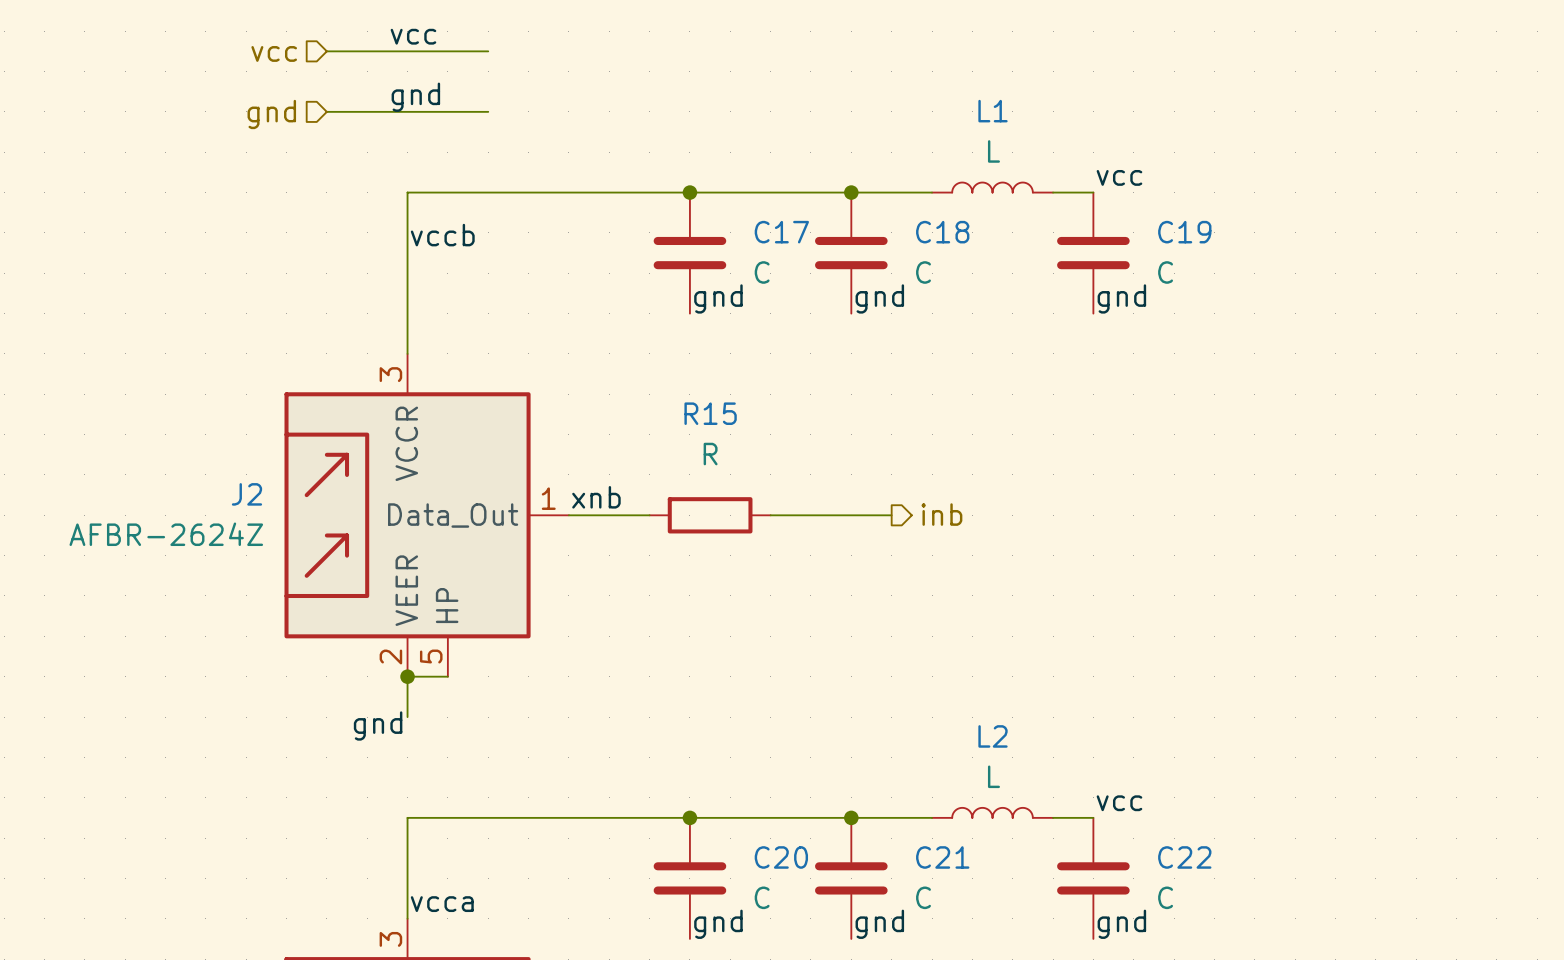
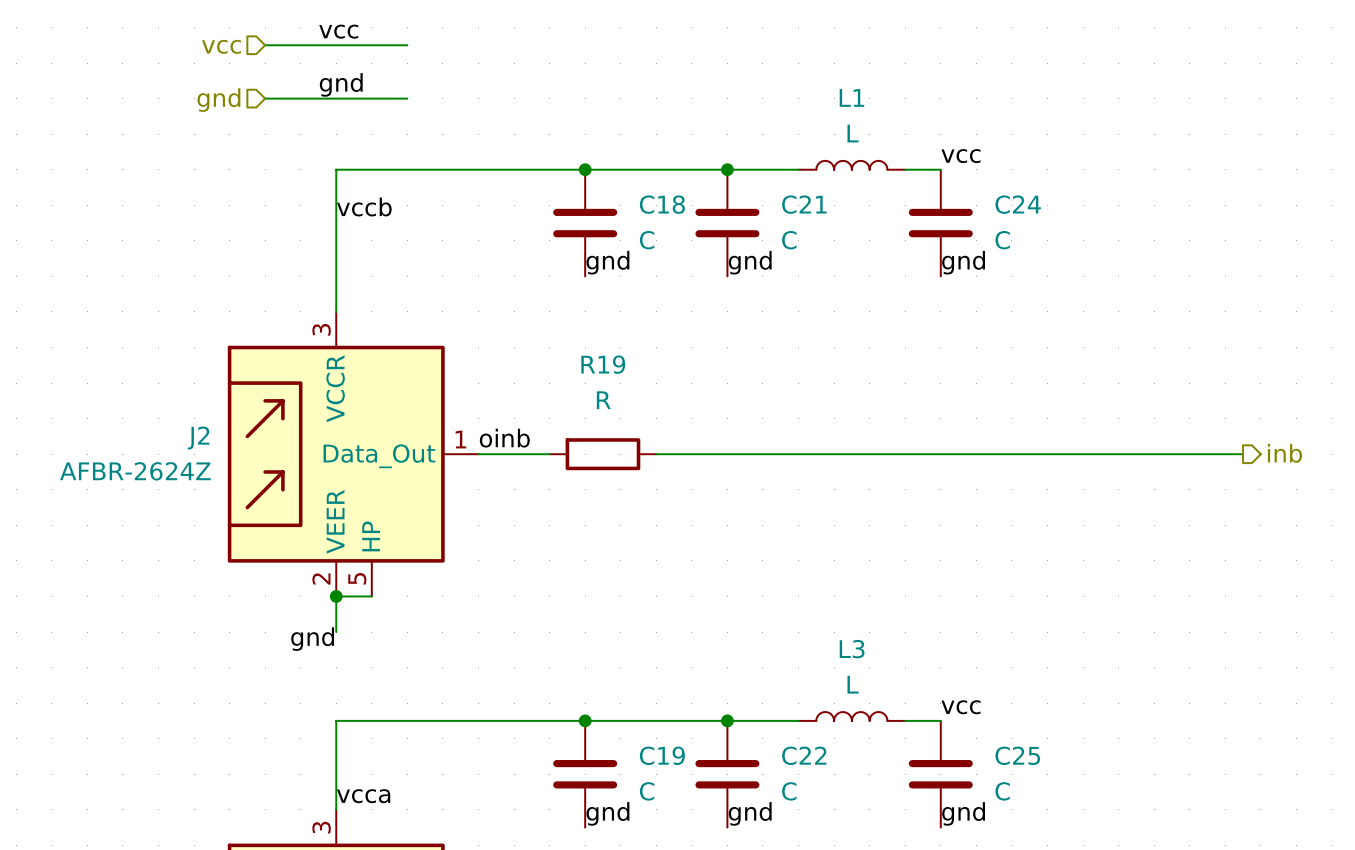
C17 name: C17 (781, 232) -> C18 (662, 204)
C18 name: C18 (942, 232) -> C21 (804, 204)
C19 name: C19 (1184, 232) -> C24 (1018, 204)
R15 name: R15 (710, 413) -> R19 (603, 364)
label: xnb (596, 497) -> oinb (504, 438)
hierarchical label: inb (941, 514) -> none
hierarchical label: none -> inb (1284, 453)
wire: none -> (762, 454) (1243, 454)
L2 name: L2 (993, 736) -> L3 (852, 649)
C20 name: C20 (781, 857) -> C19 (662, 755)
C21 name: C21 (942, 857) -> C22 (804, 755)
C22 name: C22 (1184, 857) -> C25 (1017, 755)

